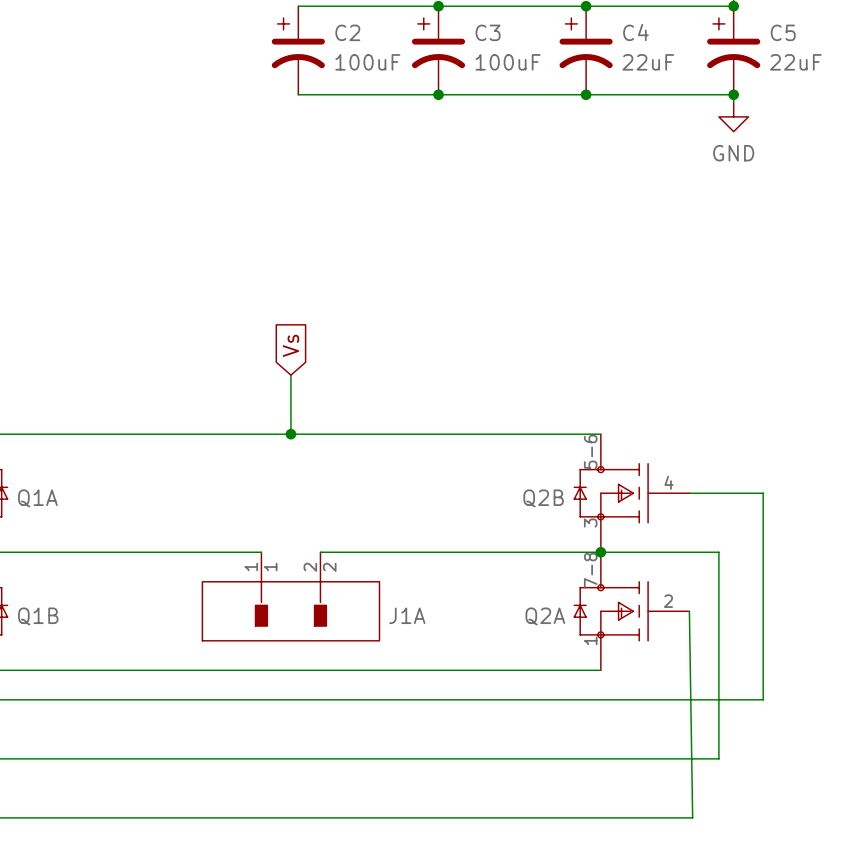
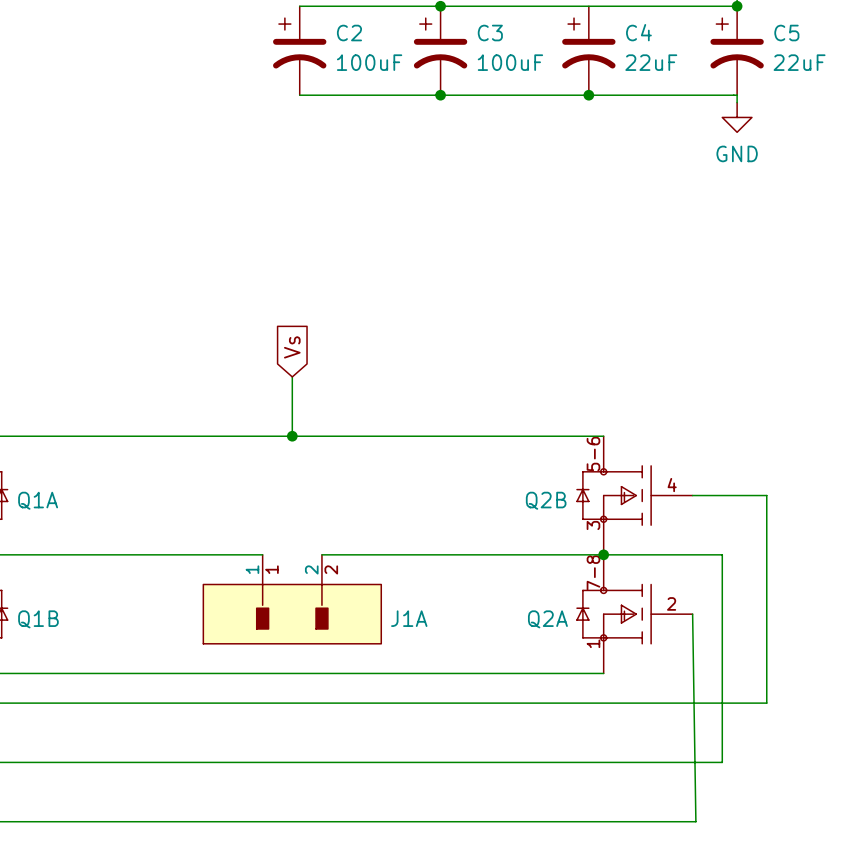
junction: (586, 6) -> none
junction: (733, 94) -> none

